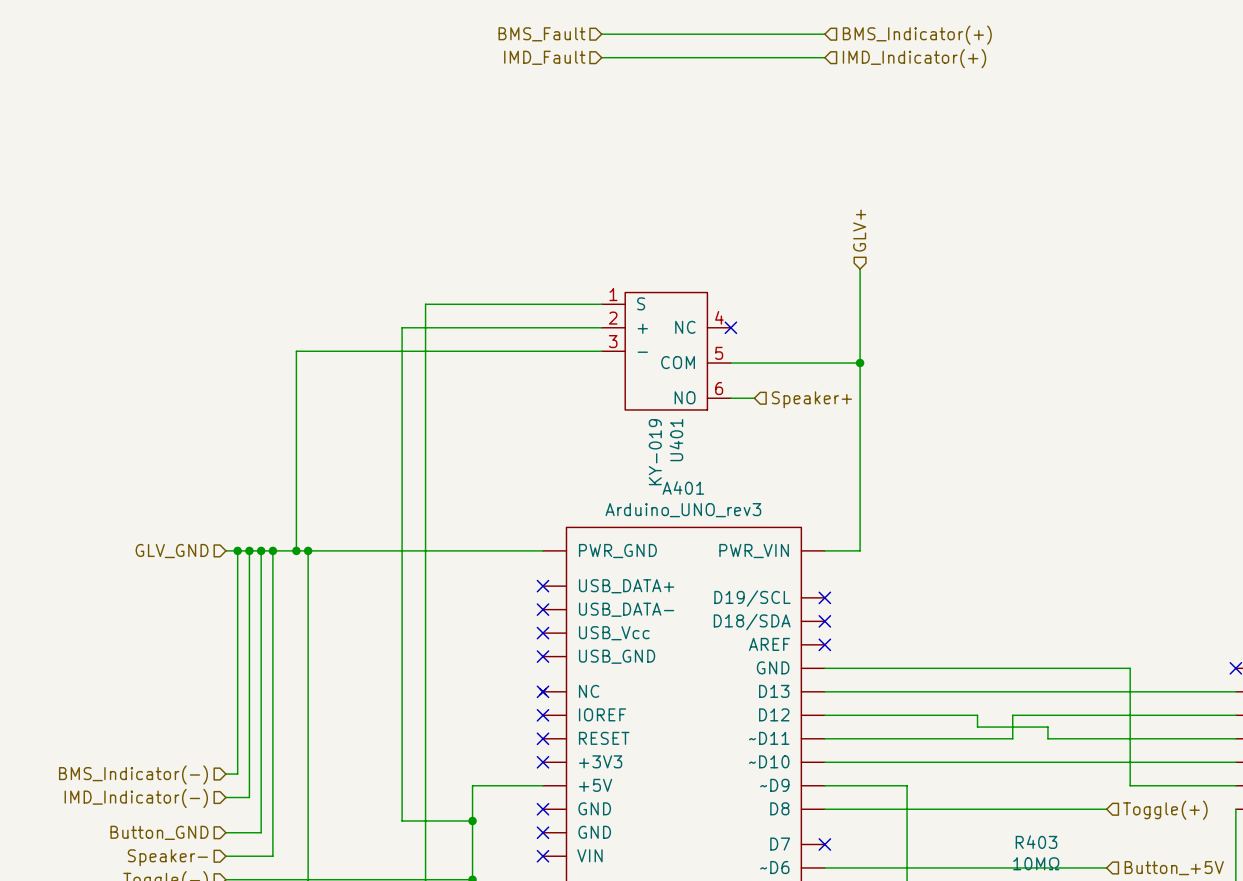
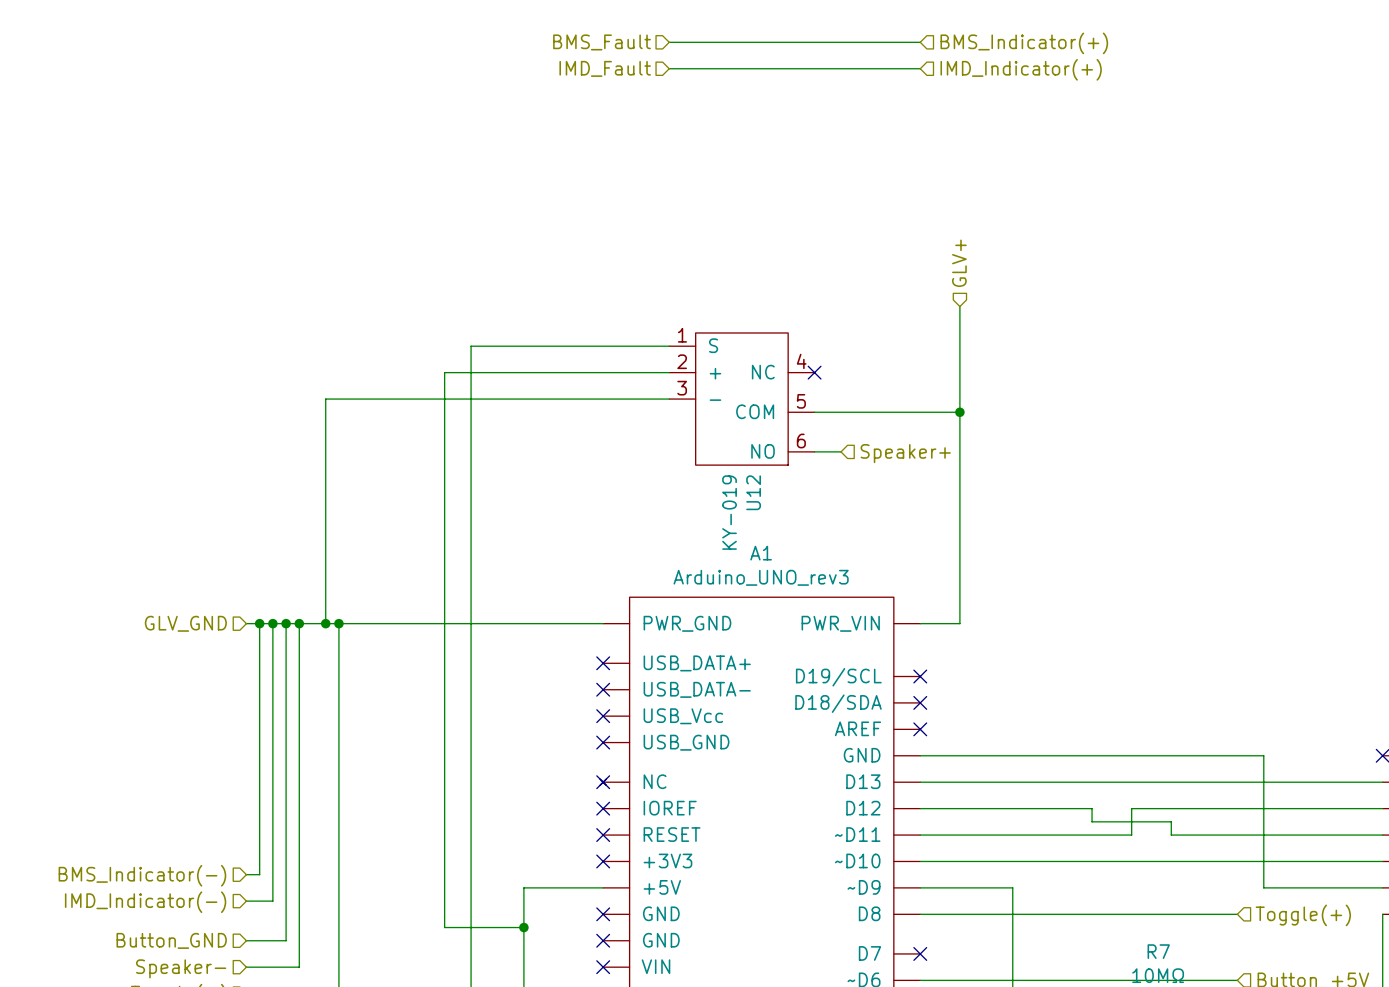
U401 name: U401 (676, 440) -> U12 (753, 492)
A401 name: A401 (683, 487) -> A1 (761, 553)
R403 name: R403 (1036, 842) -> R7 (1158, 951)

